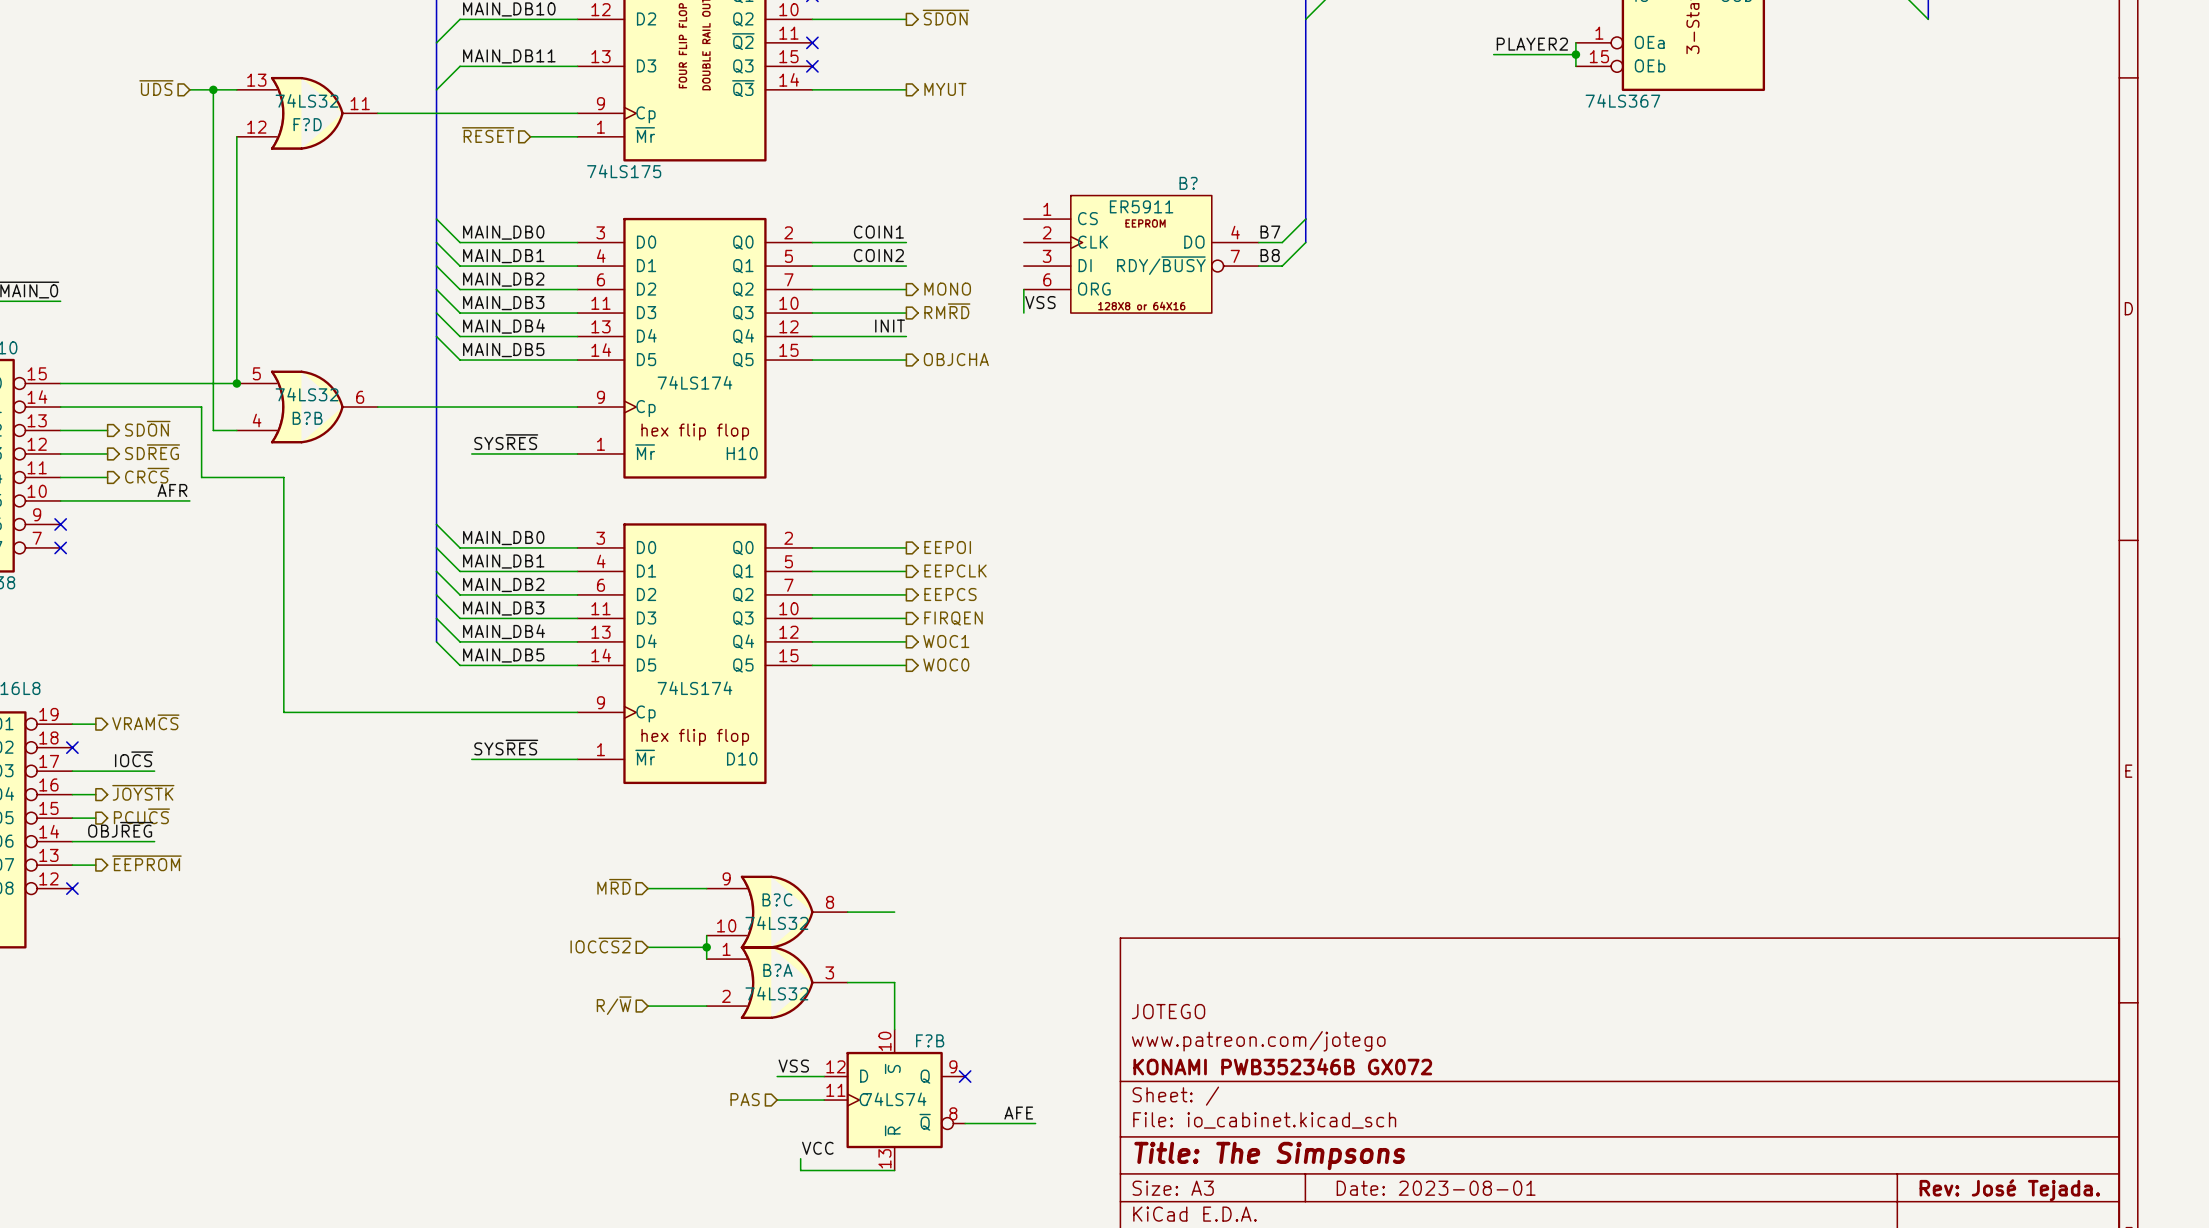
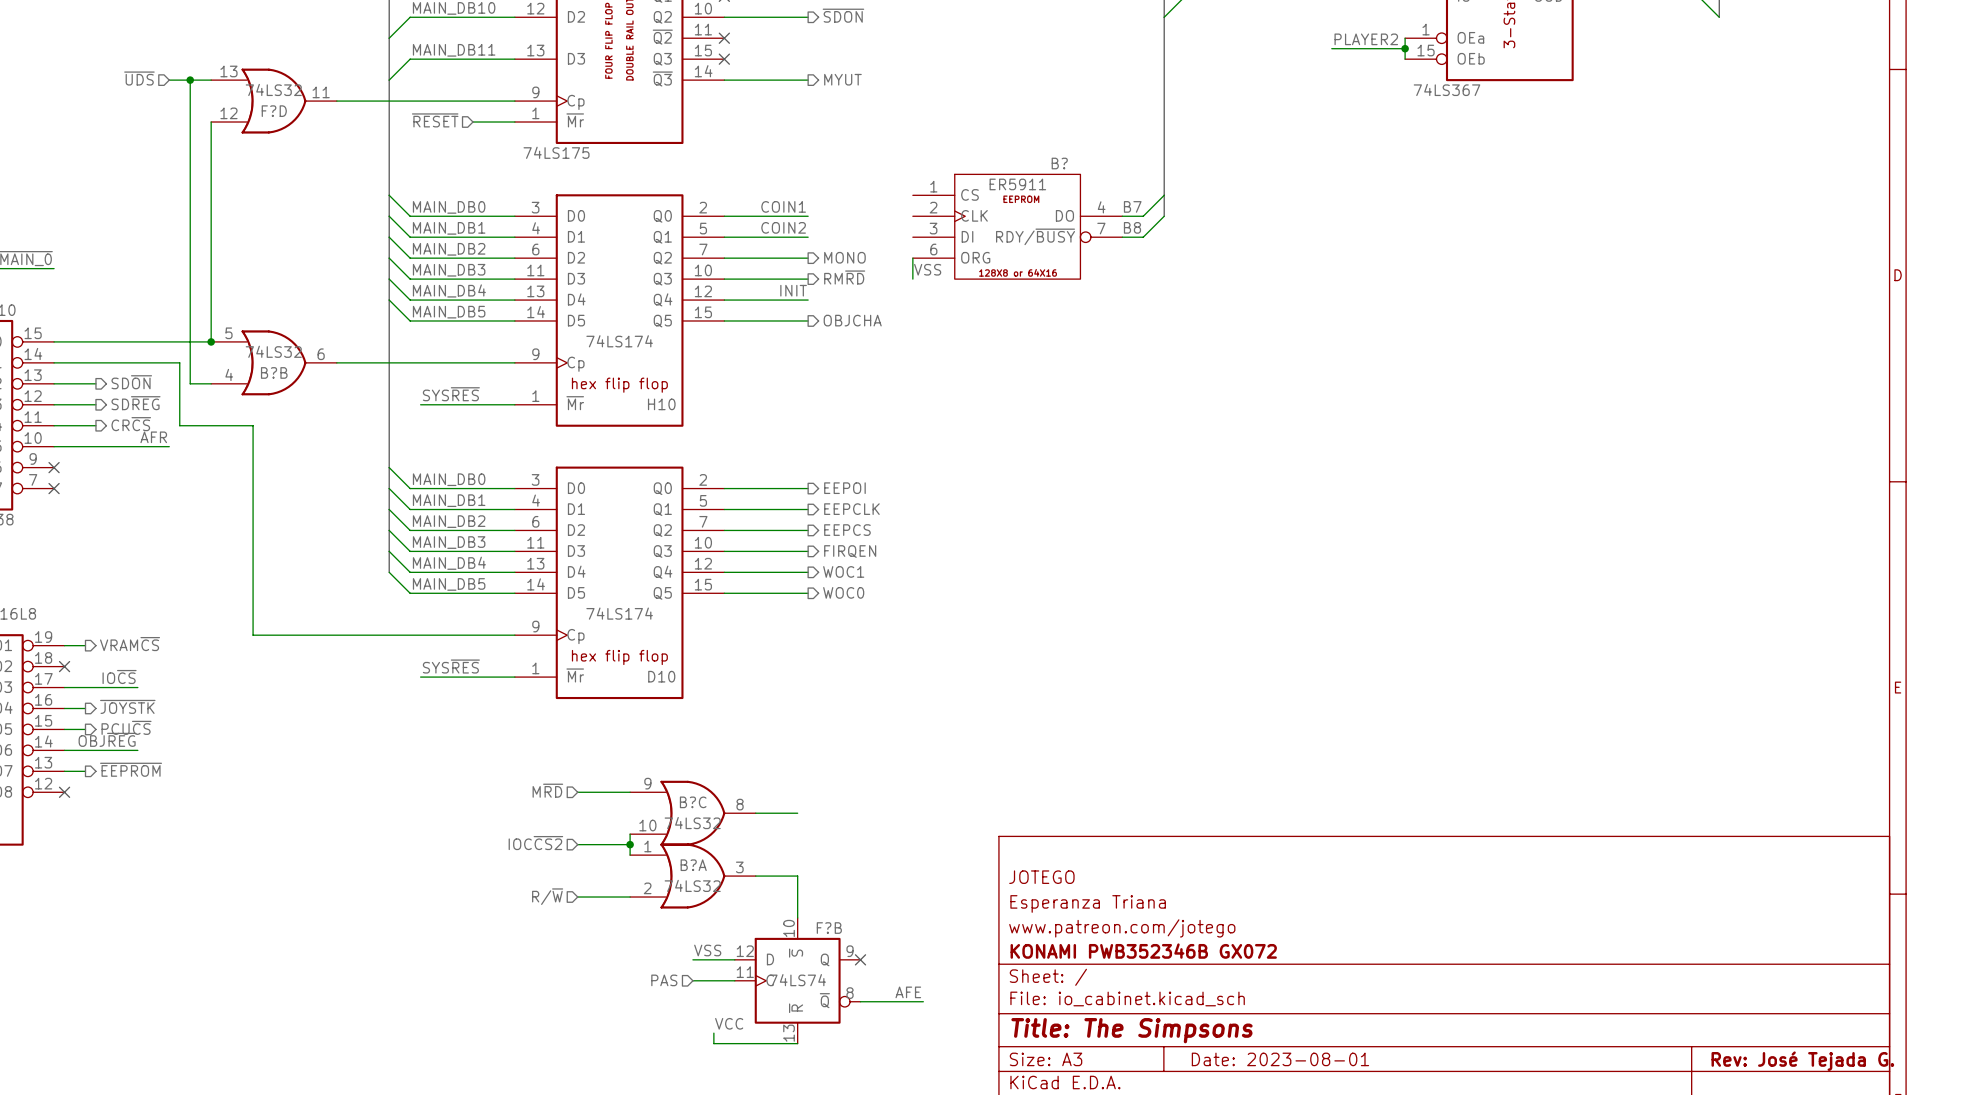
title block: none -> JOTEGO (1041, 877)
title block: JOTEGO (1168, 1011) -> Esperanza Triana (1088, 903)
title block: Rev: José Tejada. (2009, 1190) -> Rev: José Tejada G. (1802, 1061)

